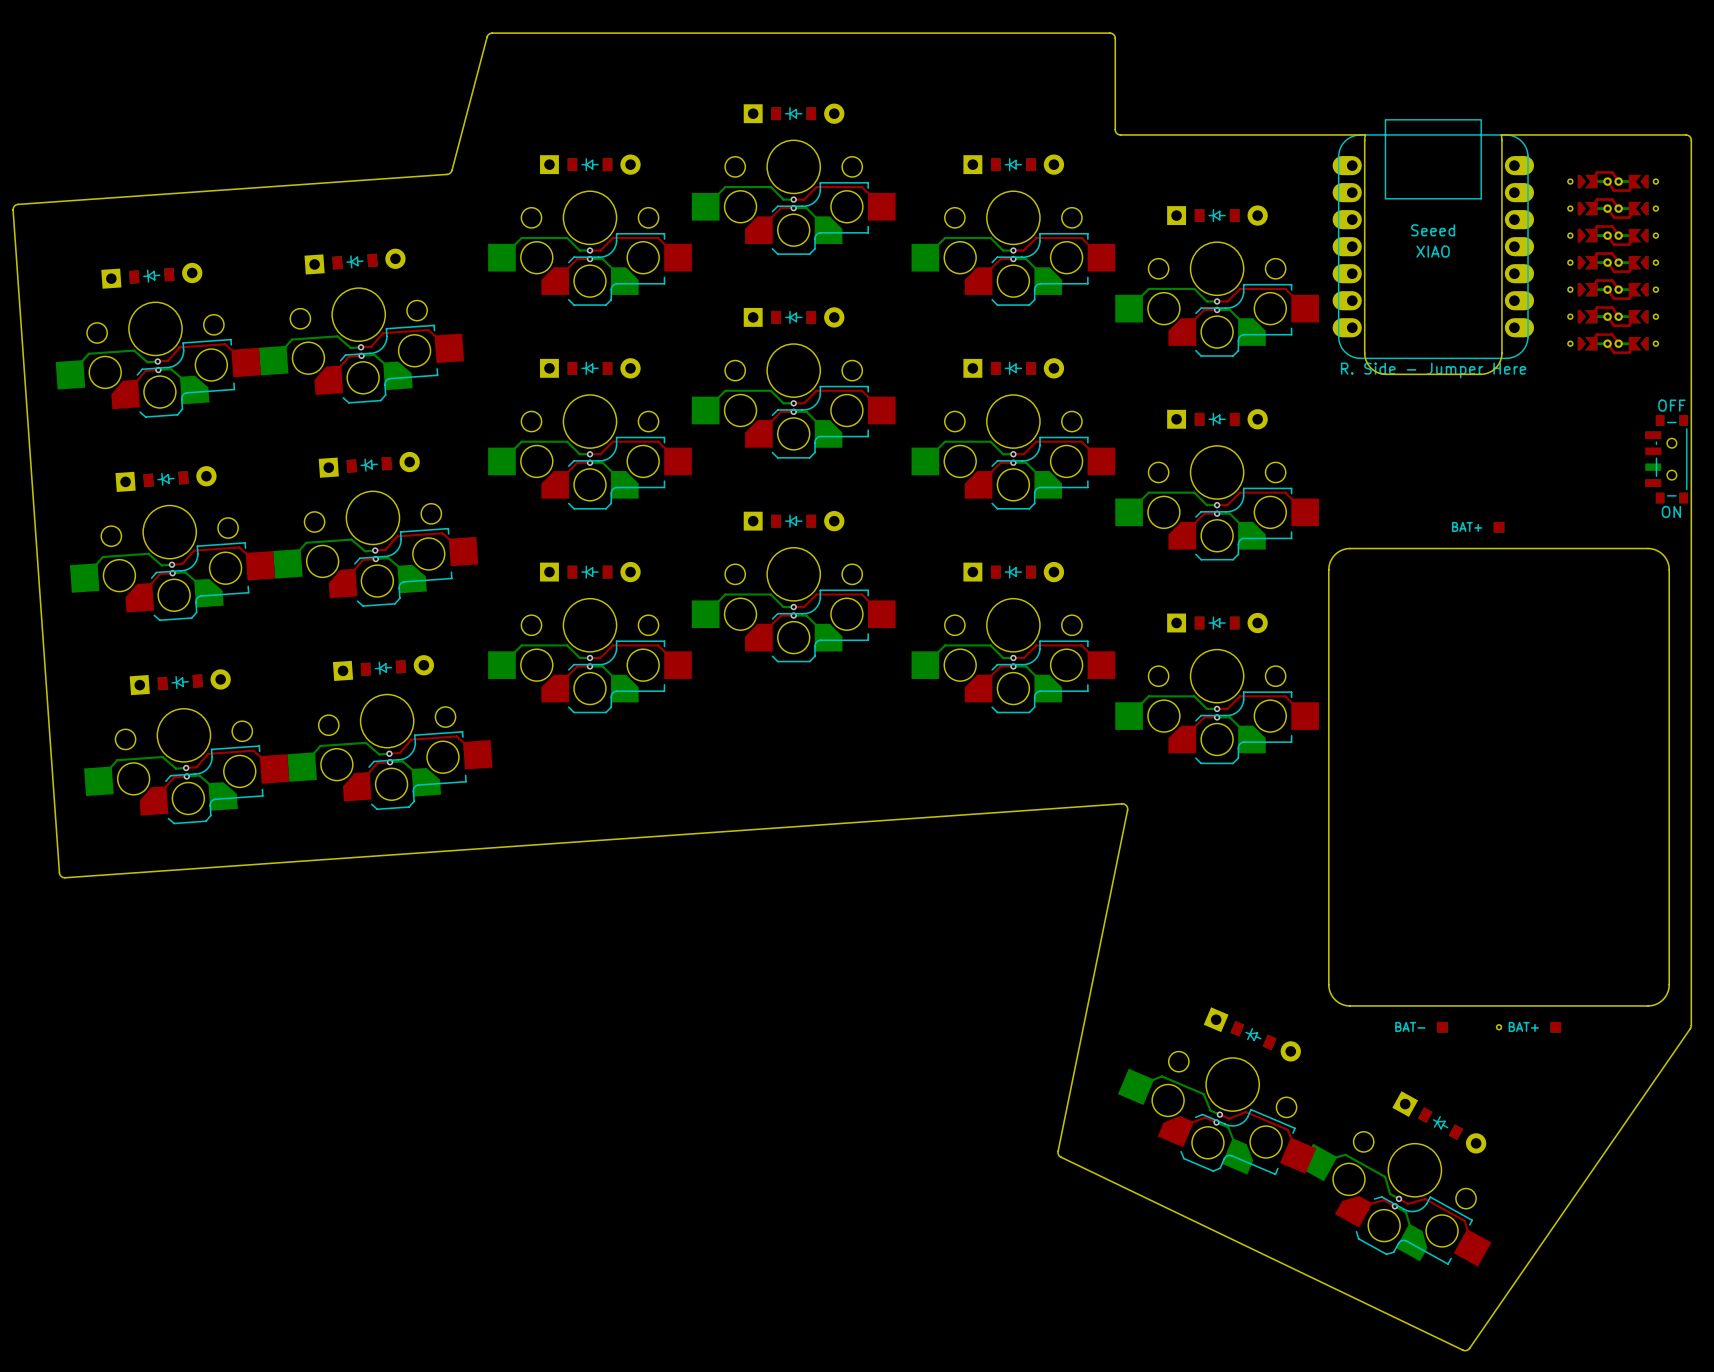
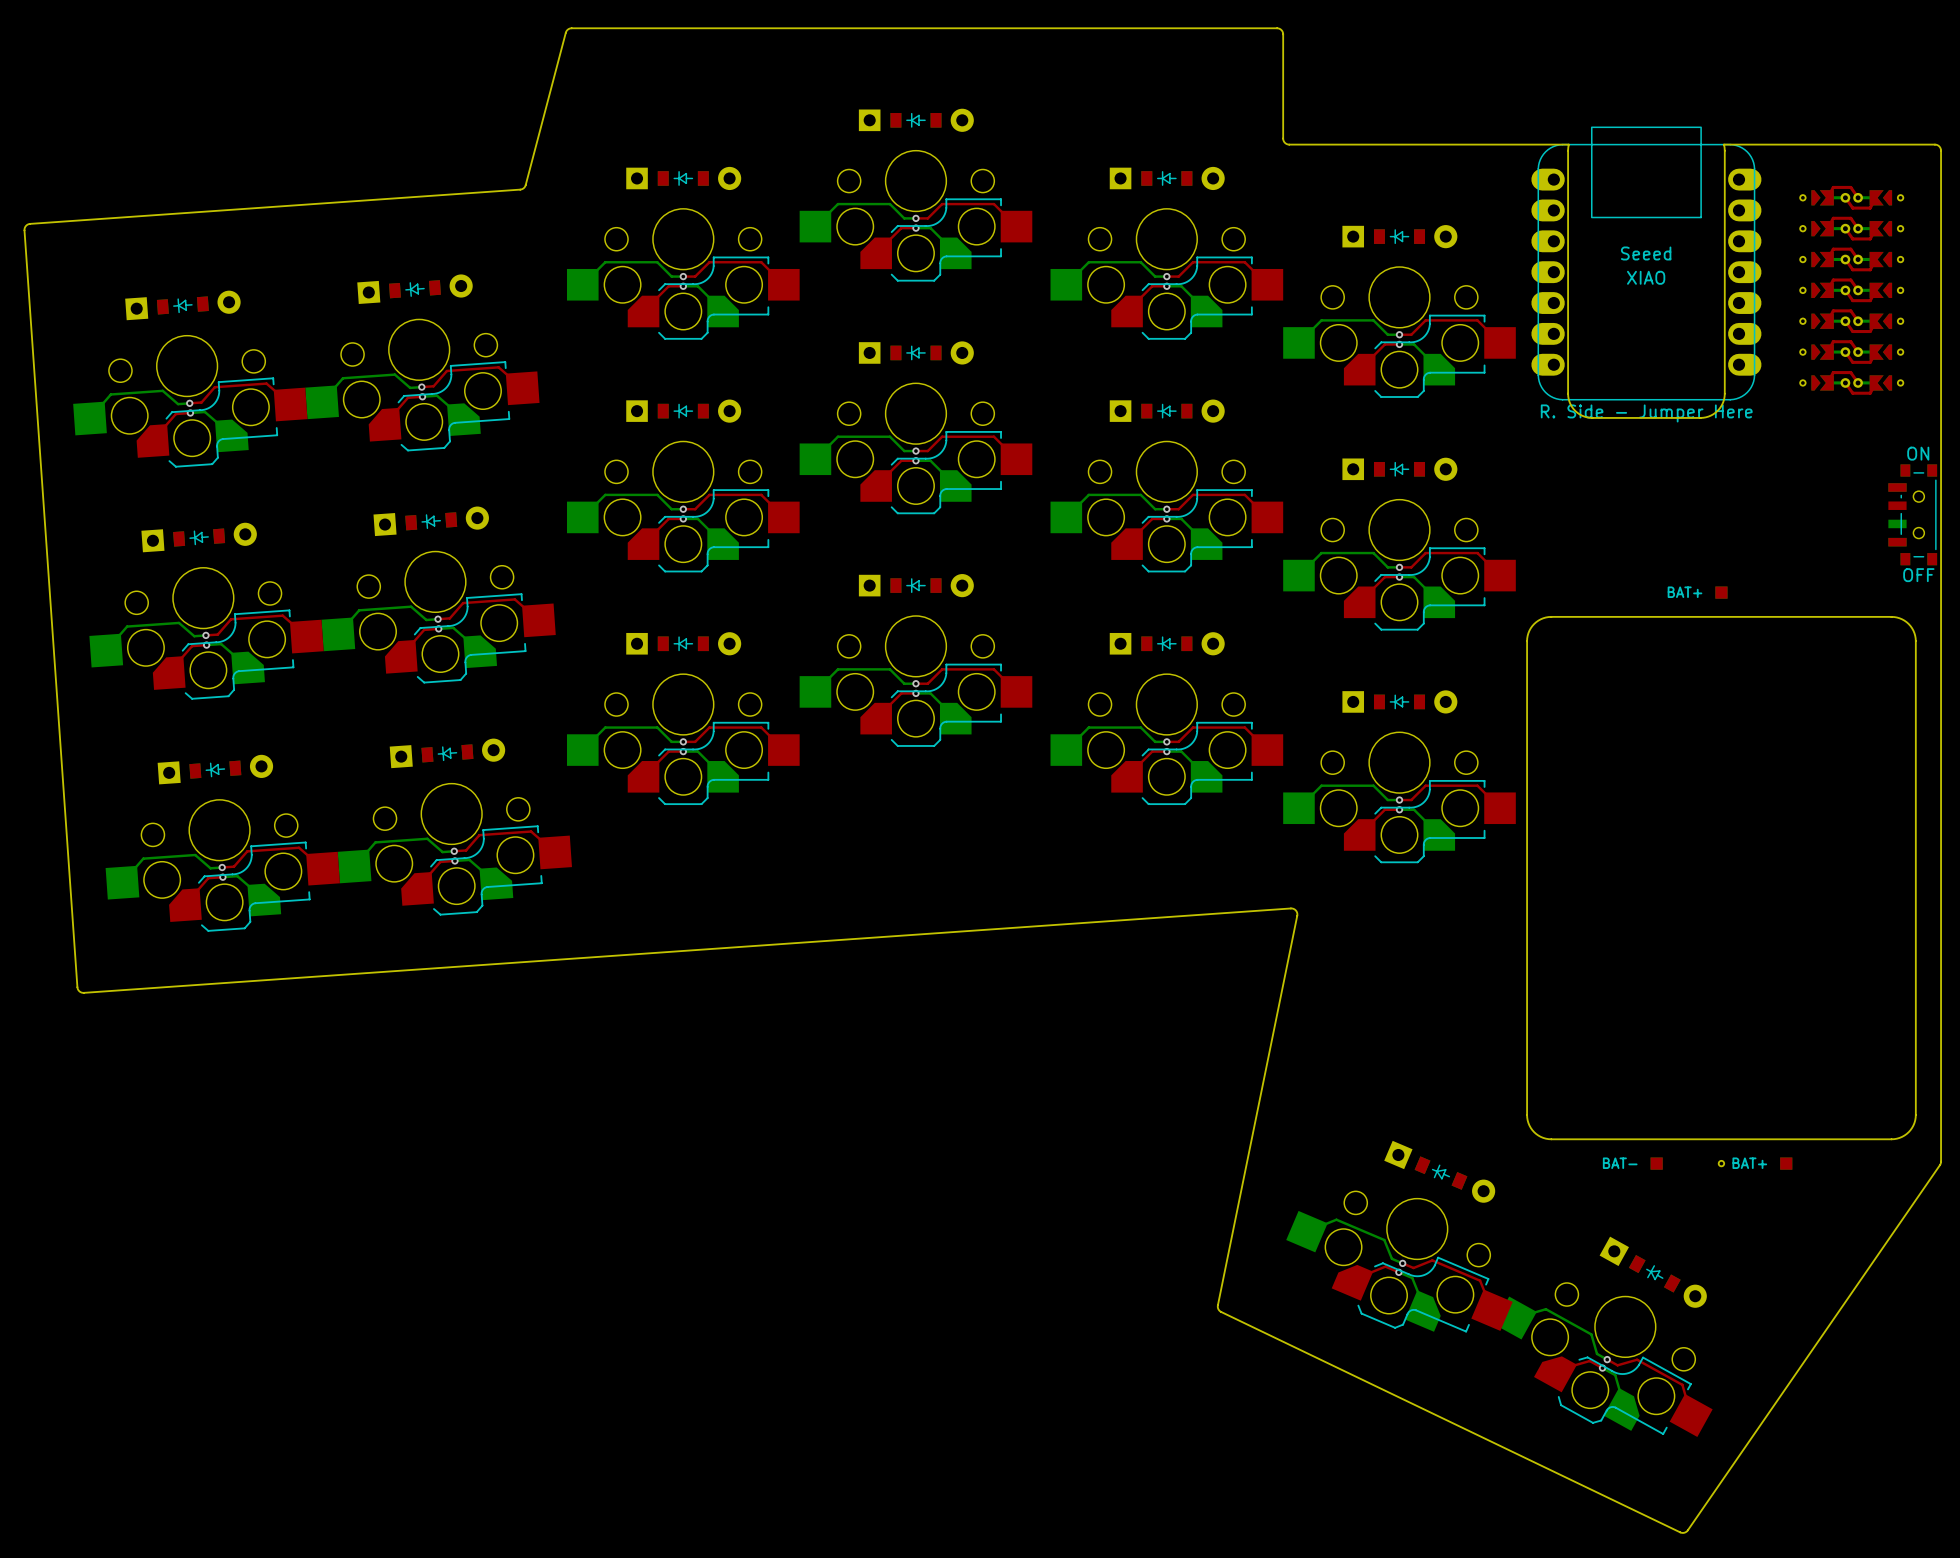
part text: OFF (1671, 405) -> ON (1918, 453)
part text: ON (1671, 511) -> OFF (1918, 575)

